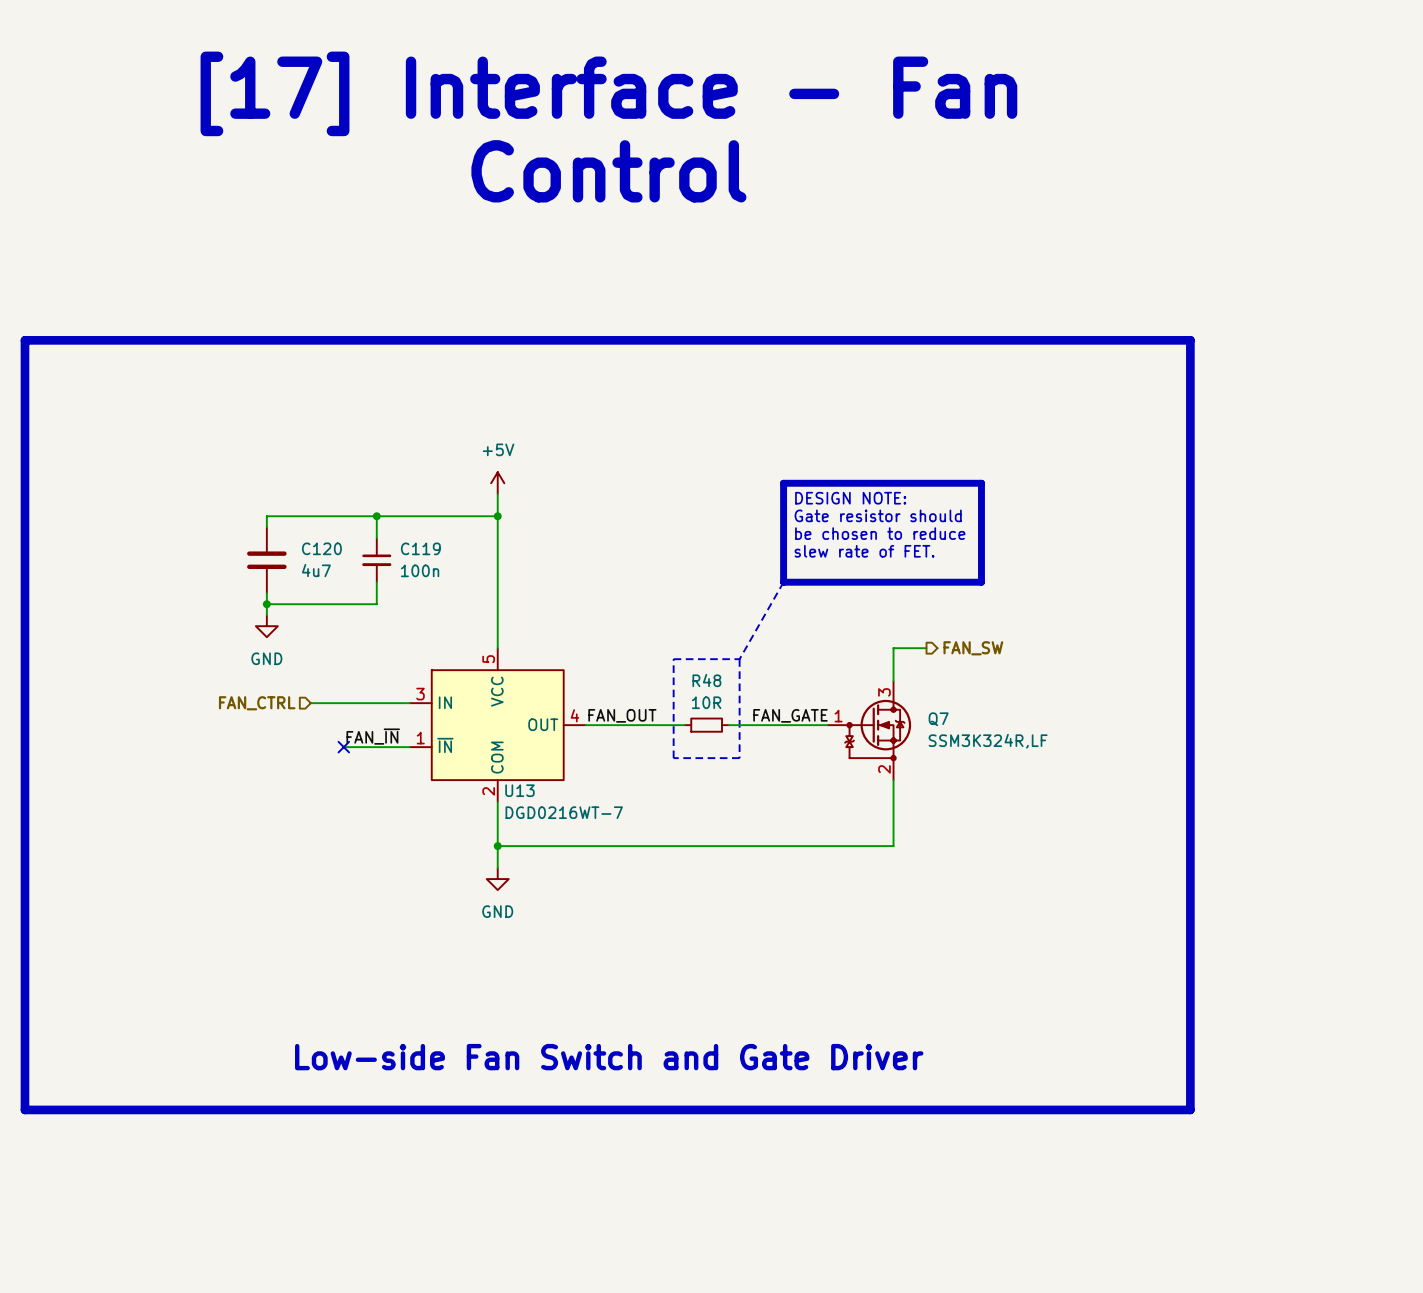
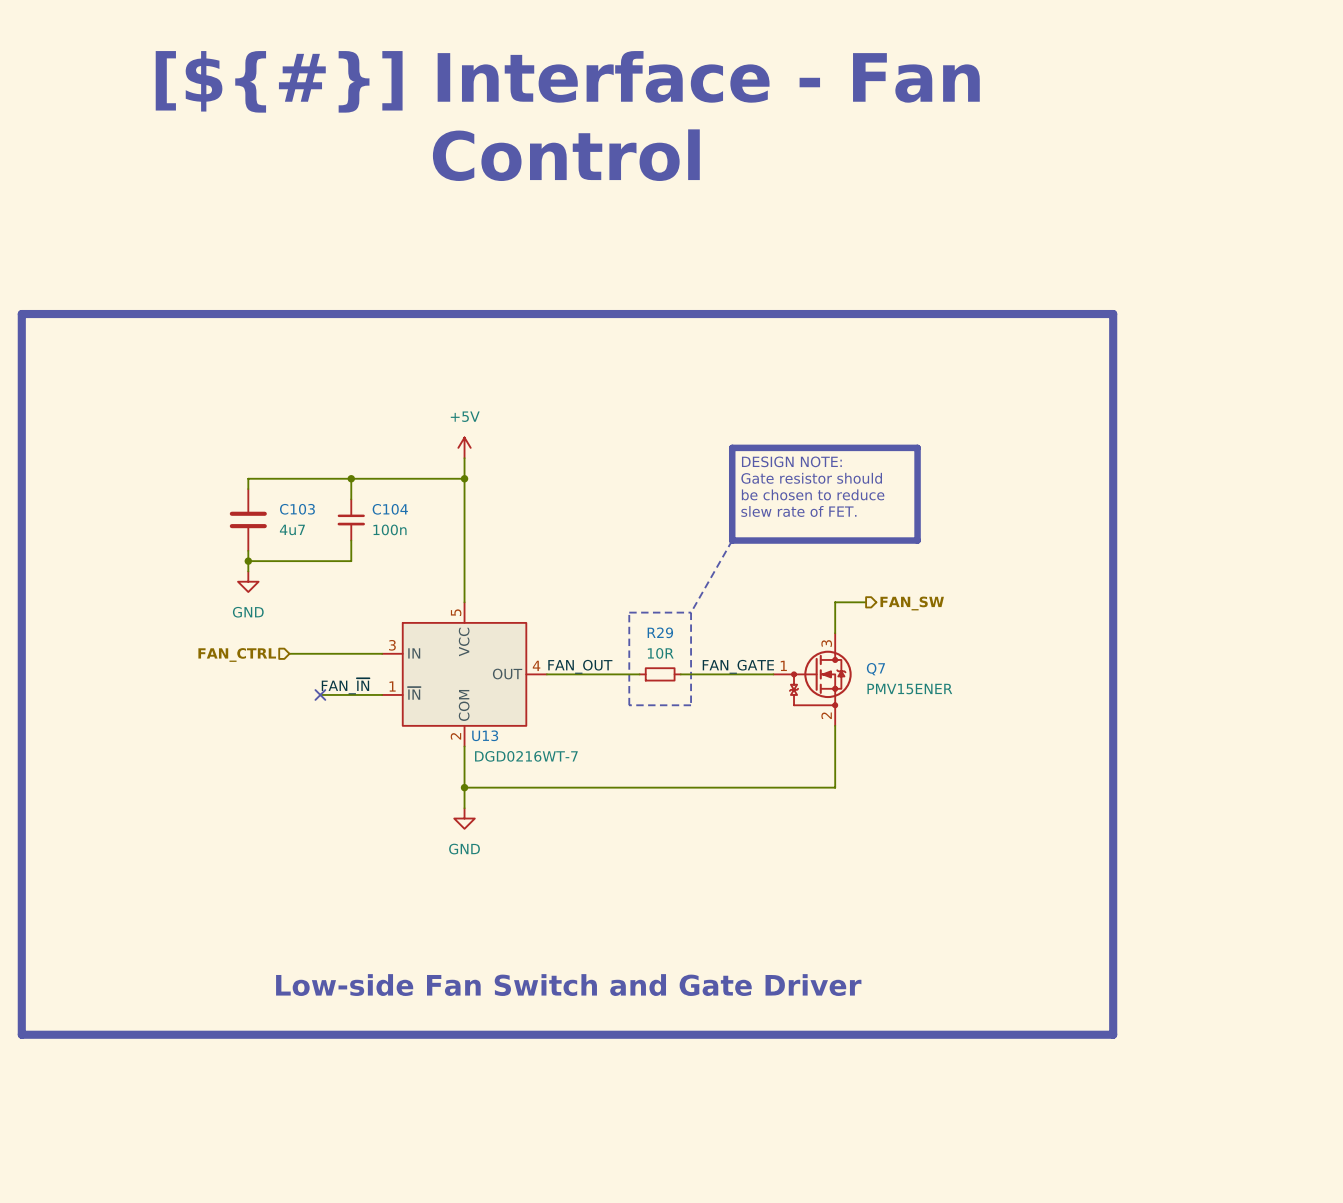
text: [17] Interface - Fan (608, 93) -> [${#}] Interface - Fan (567, 81)
C120 name: C120 (321, 548) -> C103 (297, 509)
C119 name: C119 (420, 548) -> C104 (390, 509)
R48 name: R48 (706, 680) -> R29 (660, 632)
Q7 value: SSM3K324R,LF (988, 741) -> PMV15ENER (909, 689)

